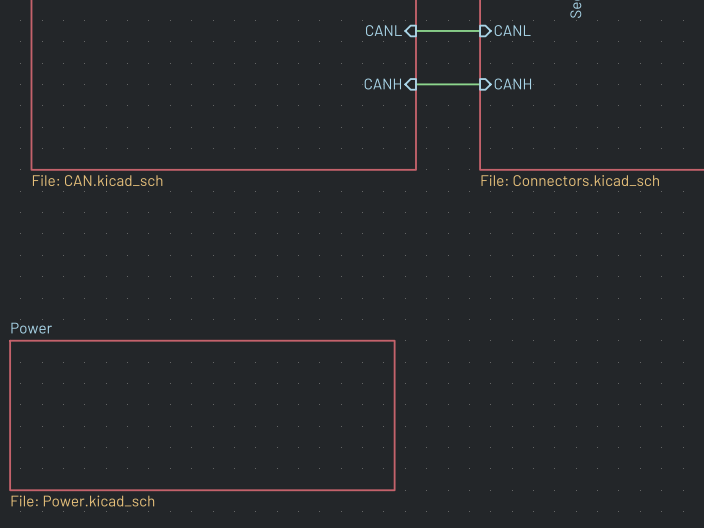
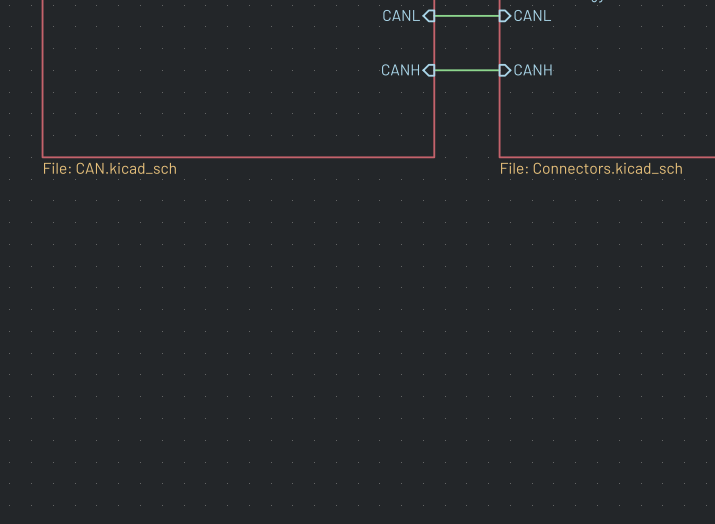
sheet Power: File: Power.kicad_sch (202, 415) -> none

